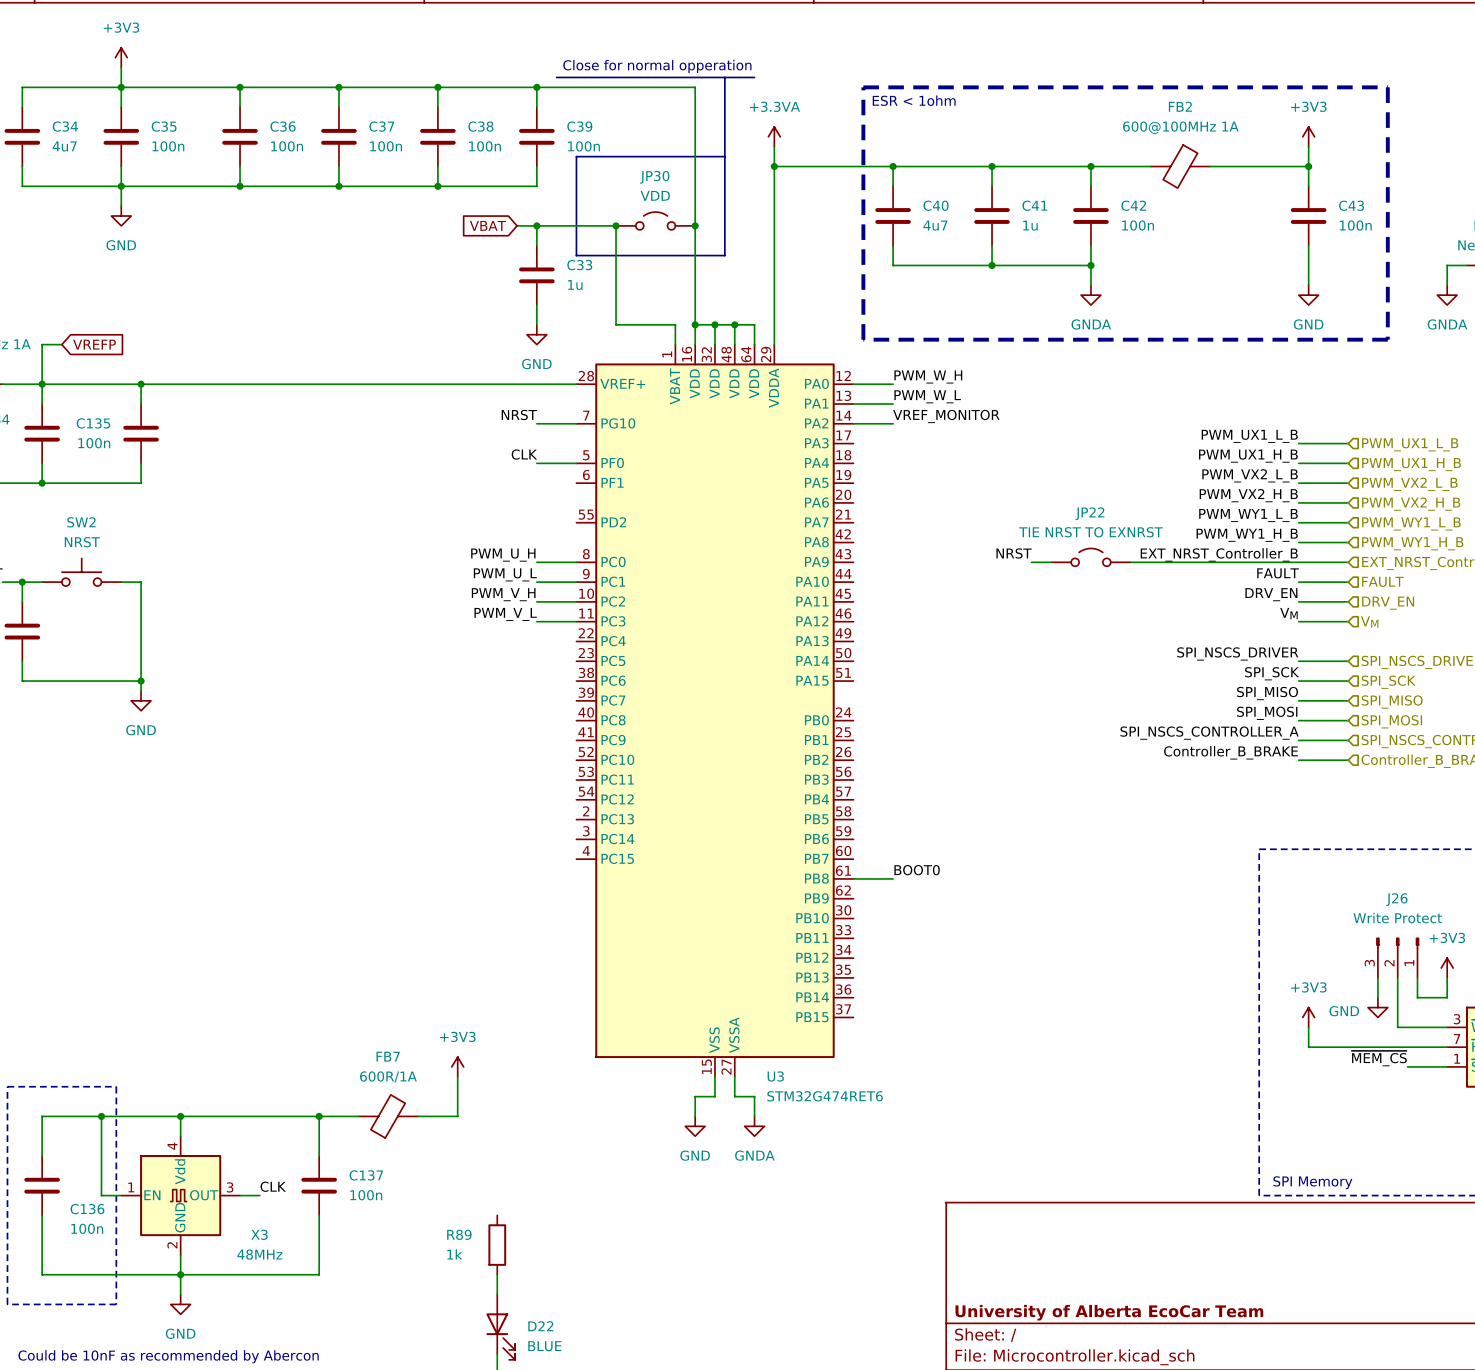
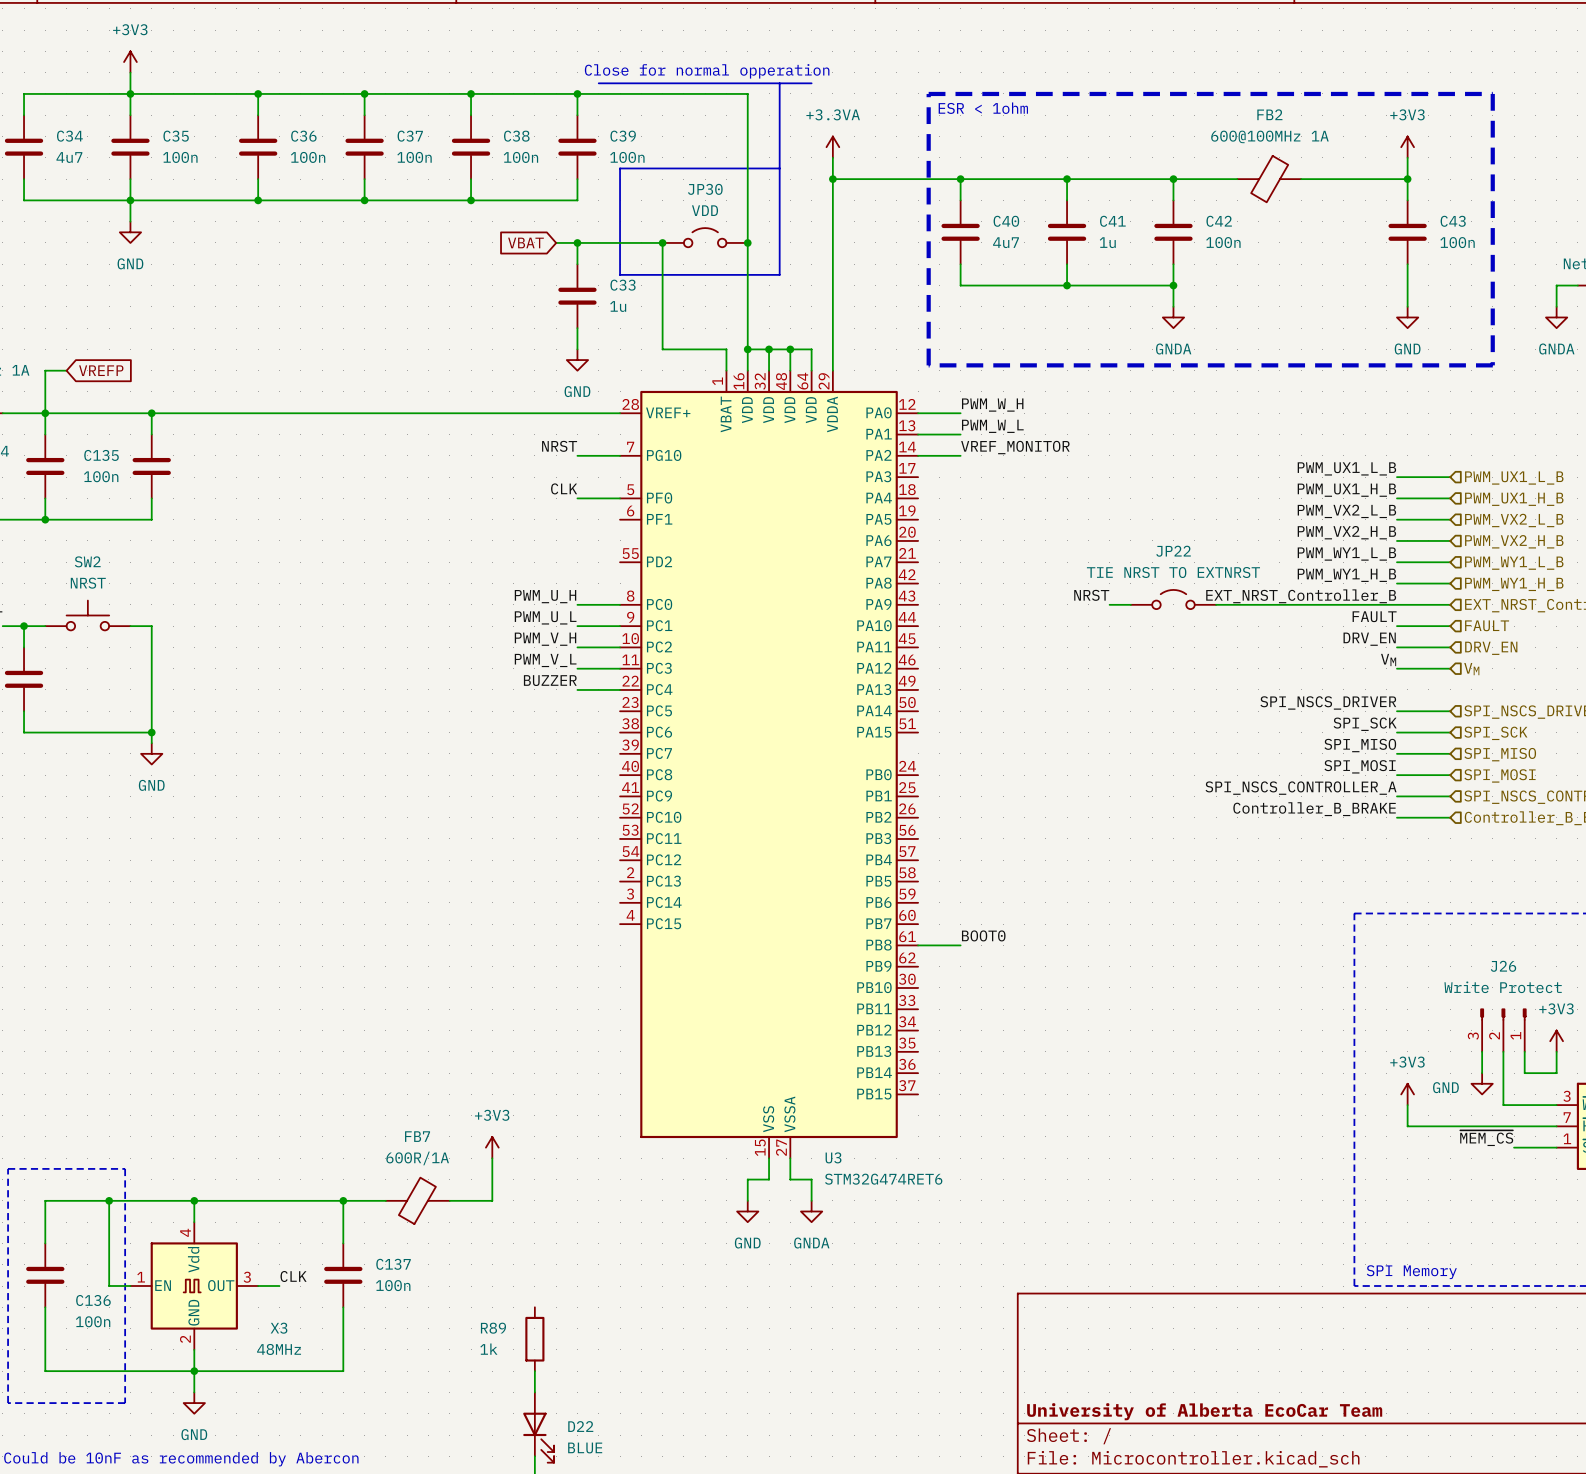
JP22 value: TIE NRST TO EXNRST (1090, 532) -> TIE NRST TO EXTNRST (1173, 572)
label: none -> BUZZER (550, 680)
wire: none -> (577, 689) (620, 689)

